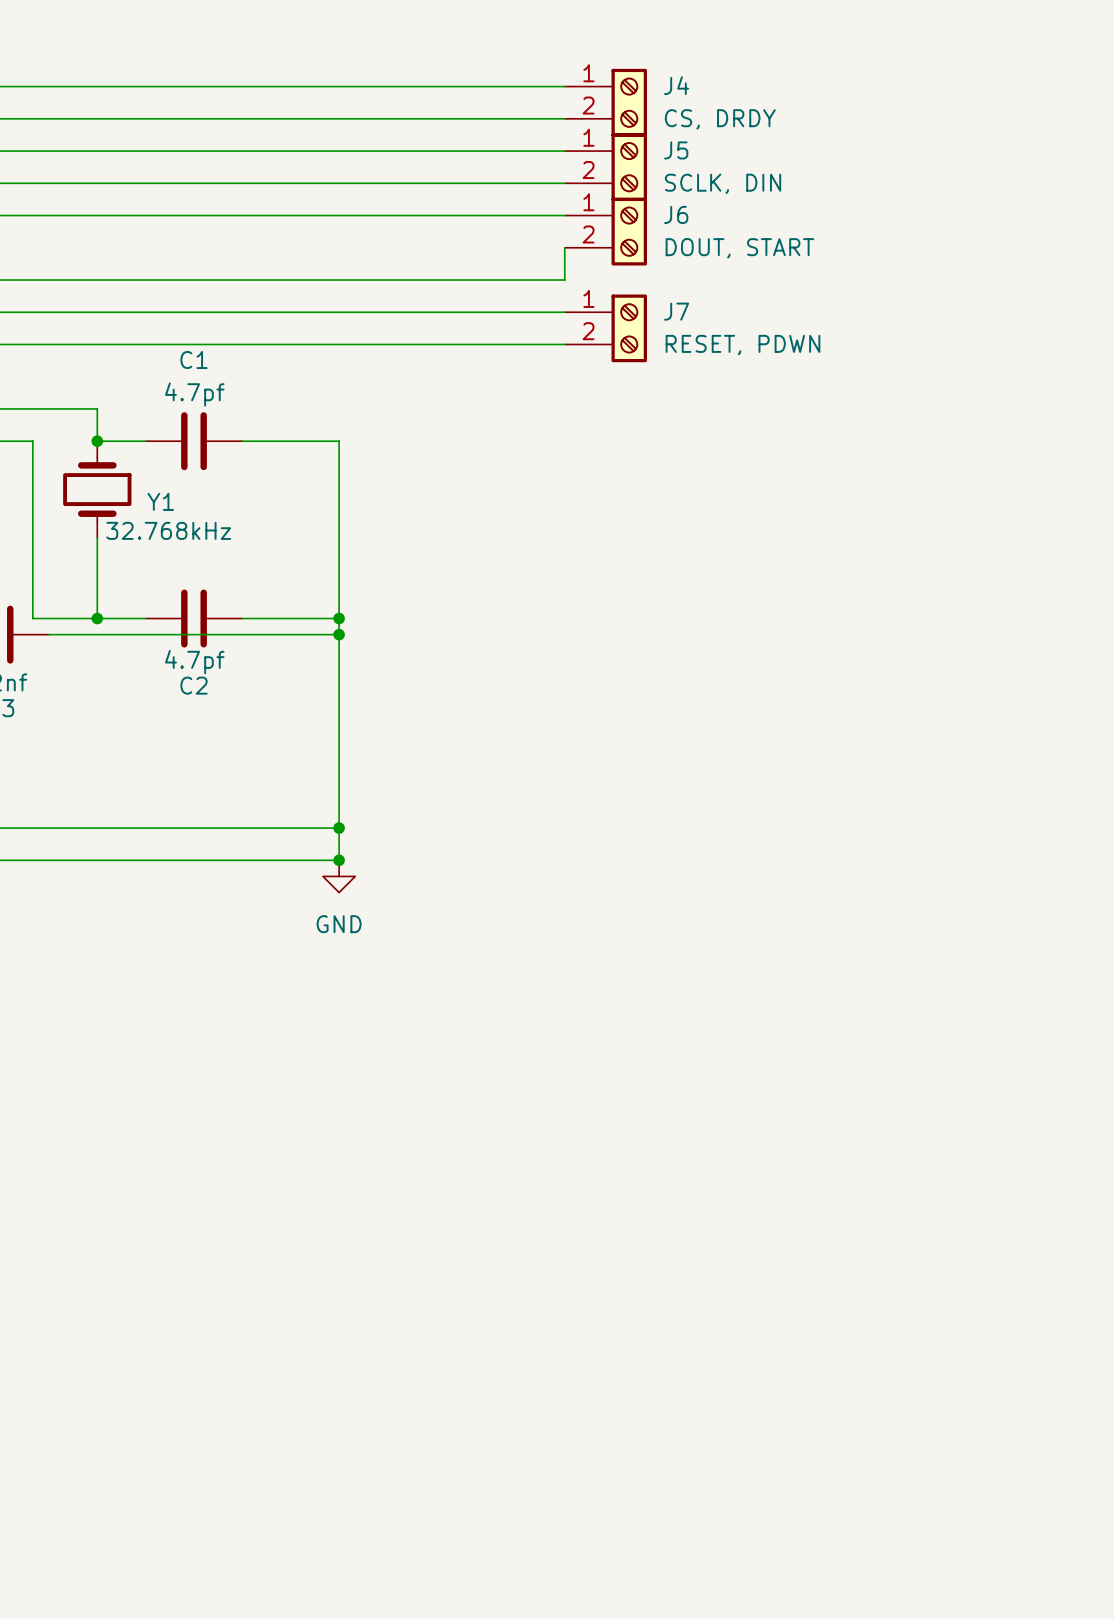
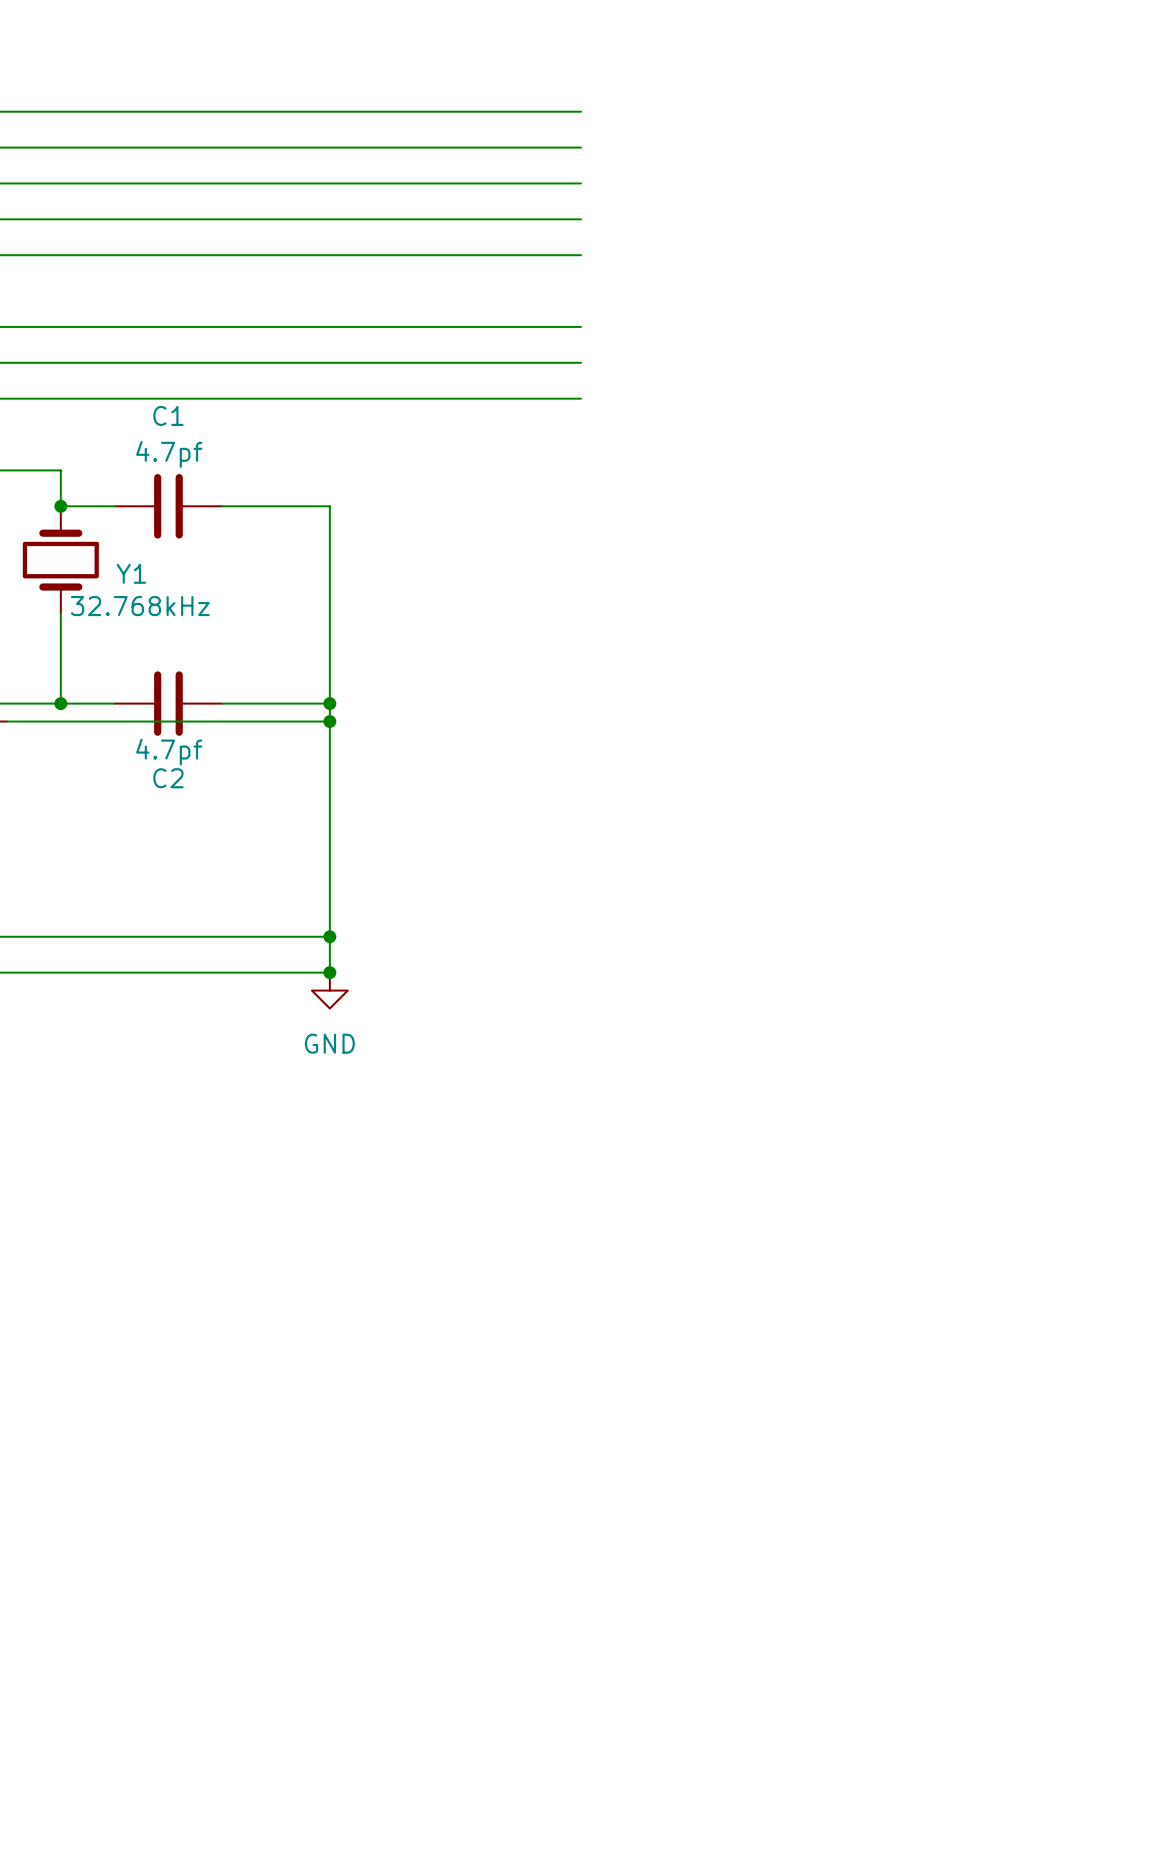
J4: CS, DRDY (605, 102) -> none
J5: SCLK, DIN (605, 167) -> none
J6: DOUT, START (605, 231) -> none
wire: (564, 247) (564, 280) -> none
J7: RESET, PDWN (605, 328) -> none

